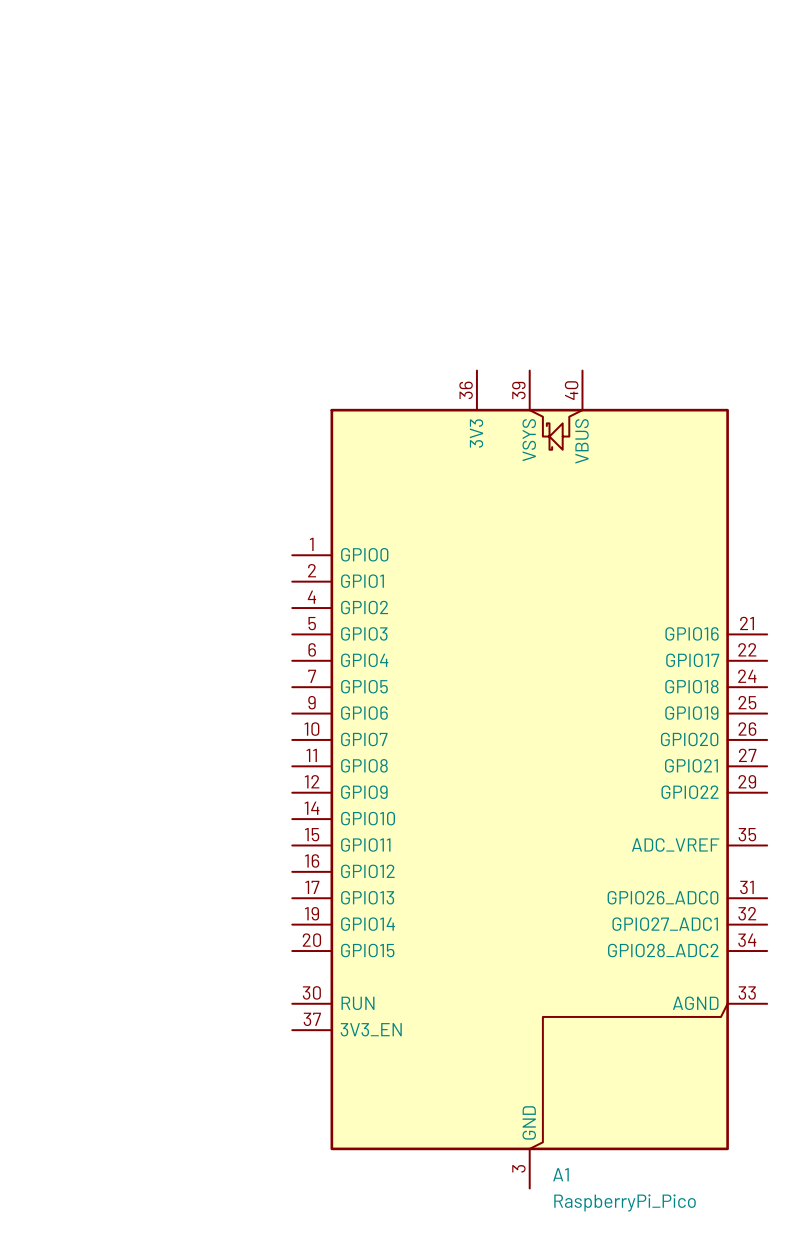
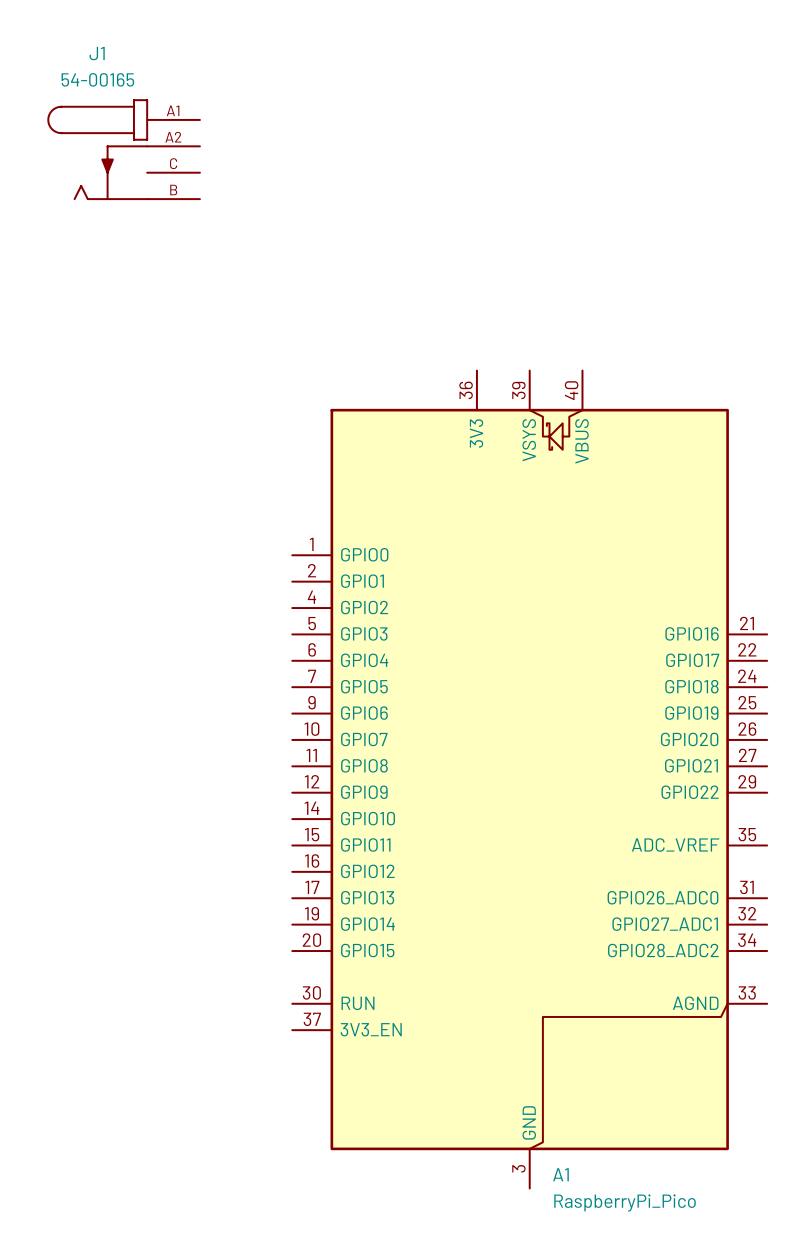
J1: none -> 54-00165 (123, 149)

